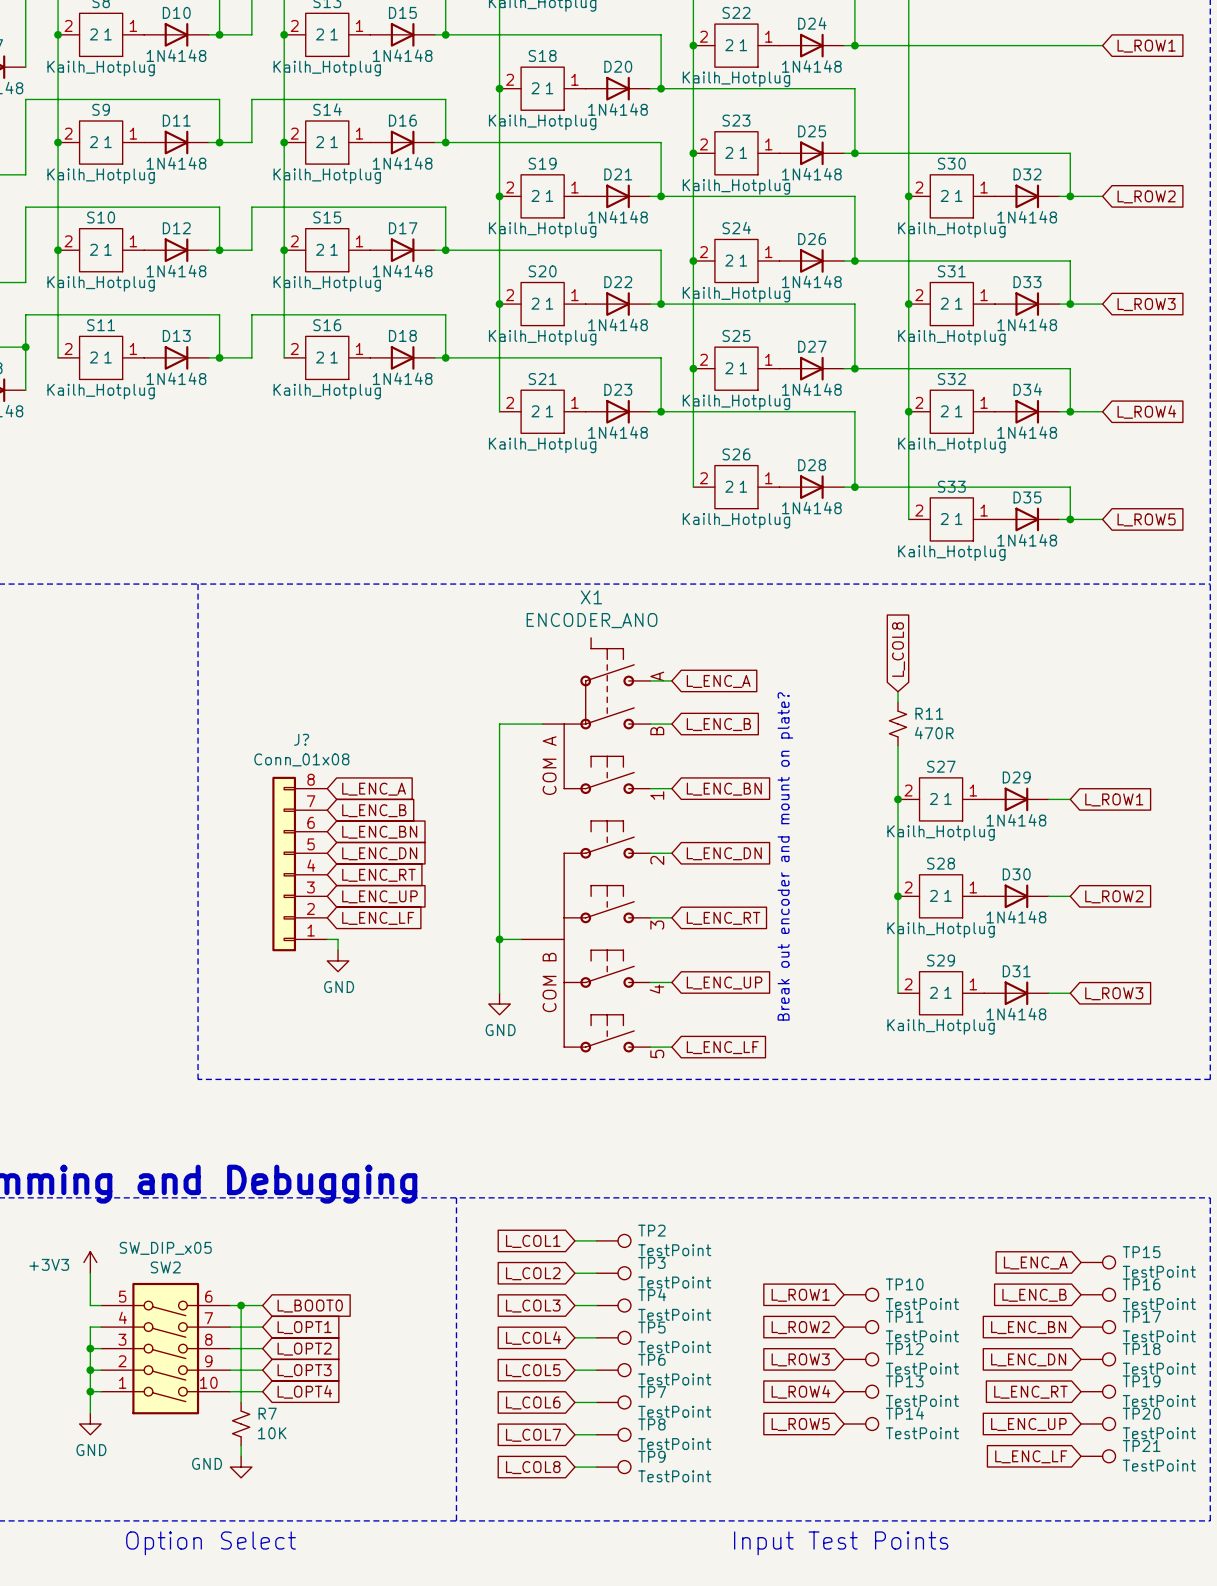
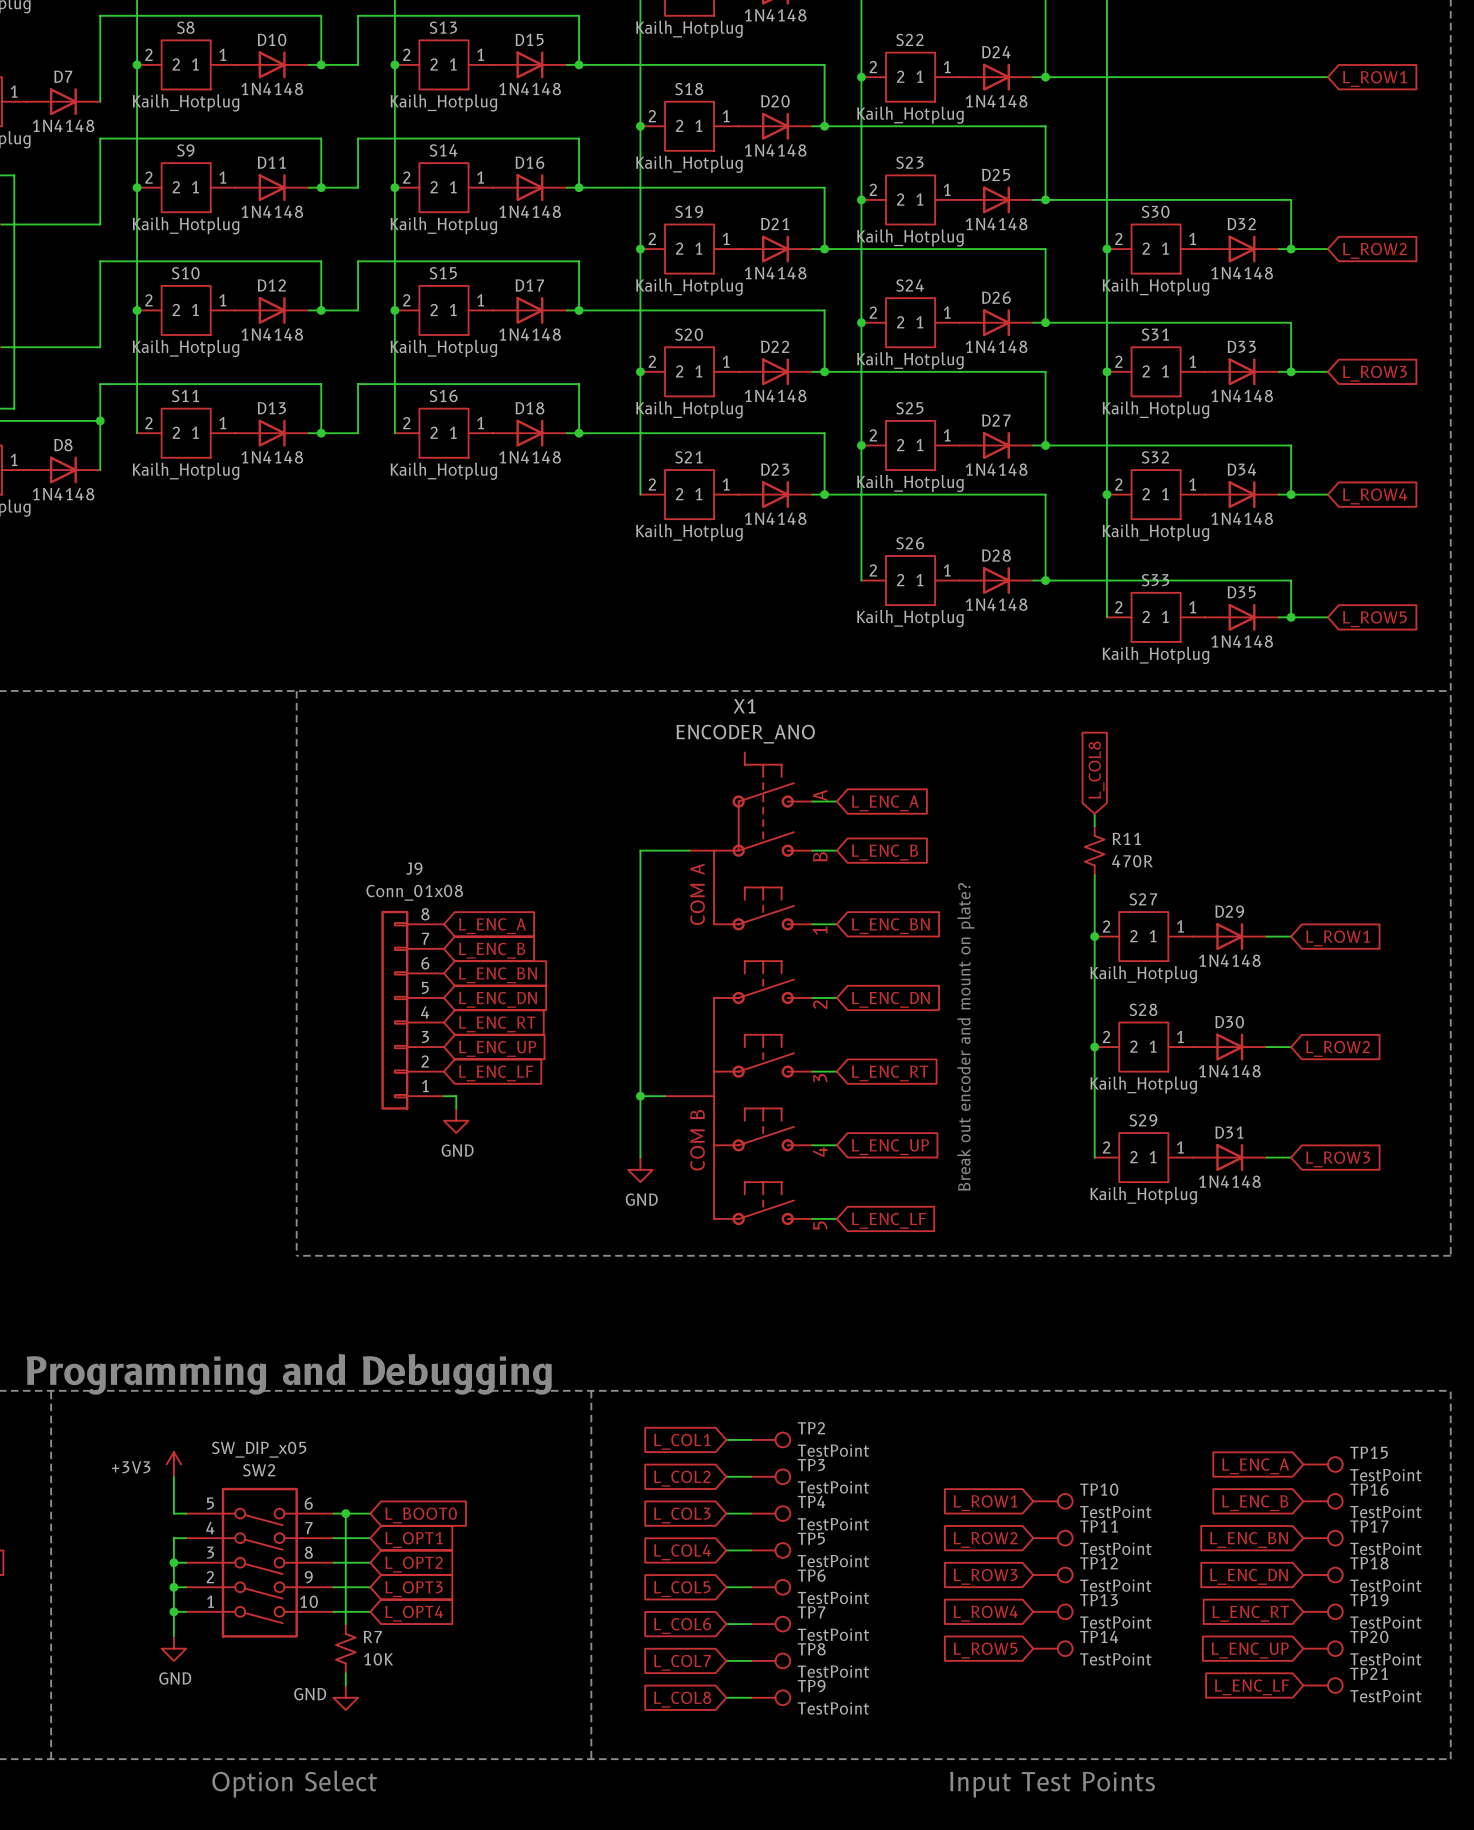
J? name: J? (301, 739) -> J9 (414, 868)

